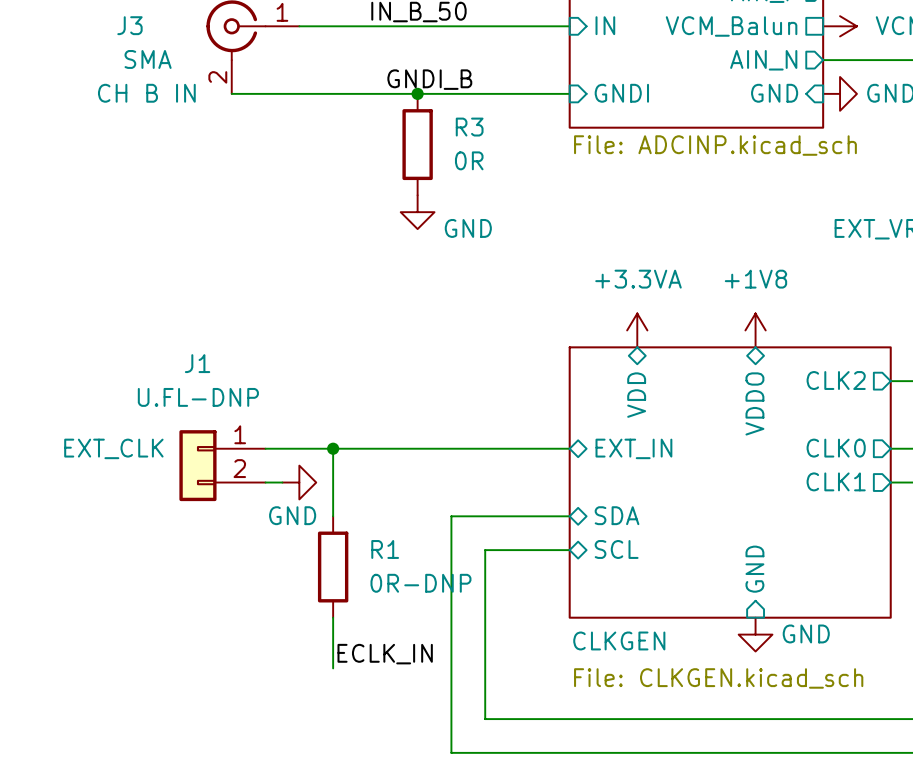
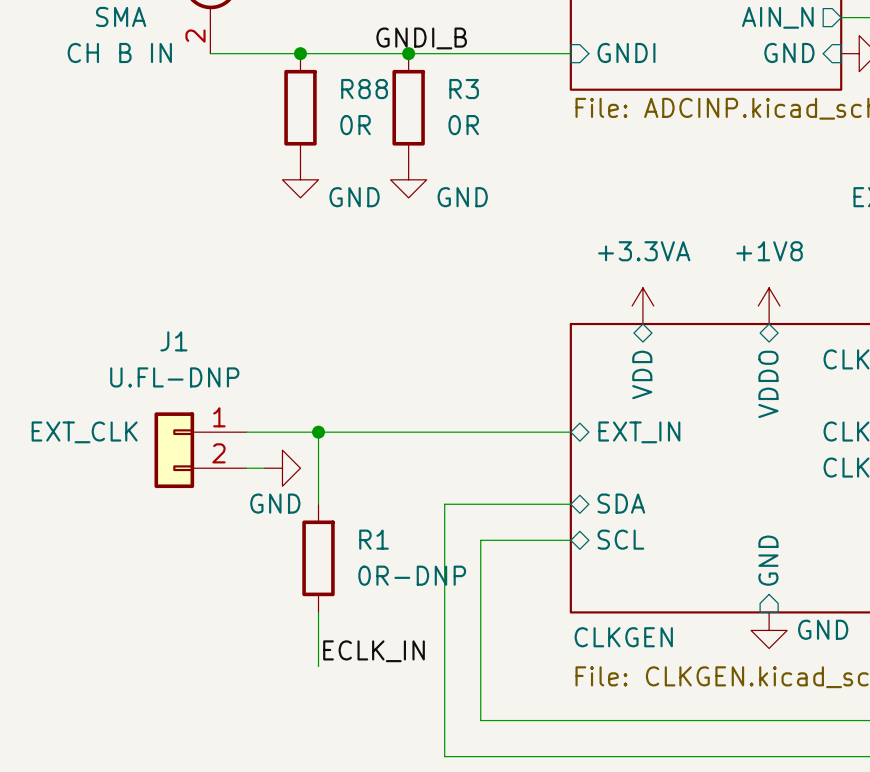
junction: none -> (300, 53)
R88: none -> 0R (300, 107)
power symbol: none -> GND (300, 179)

